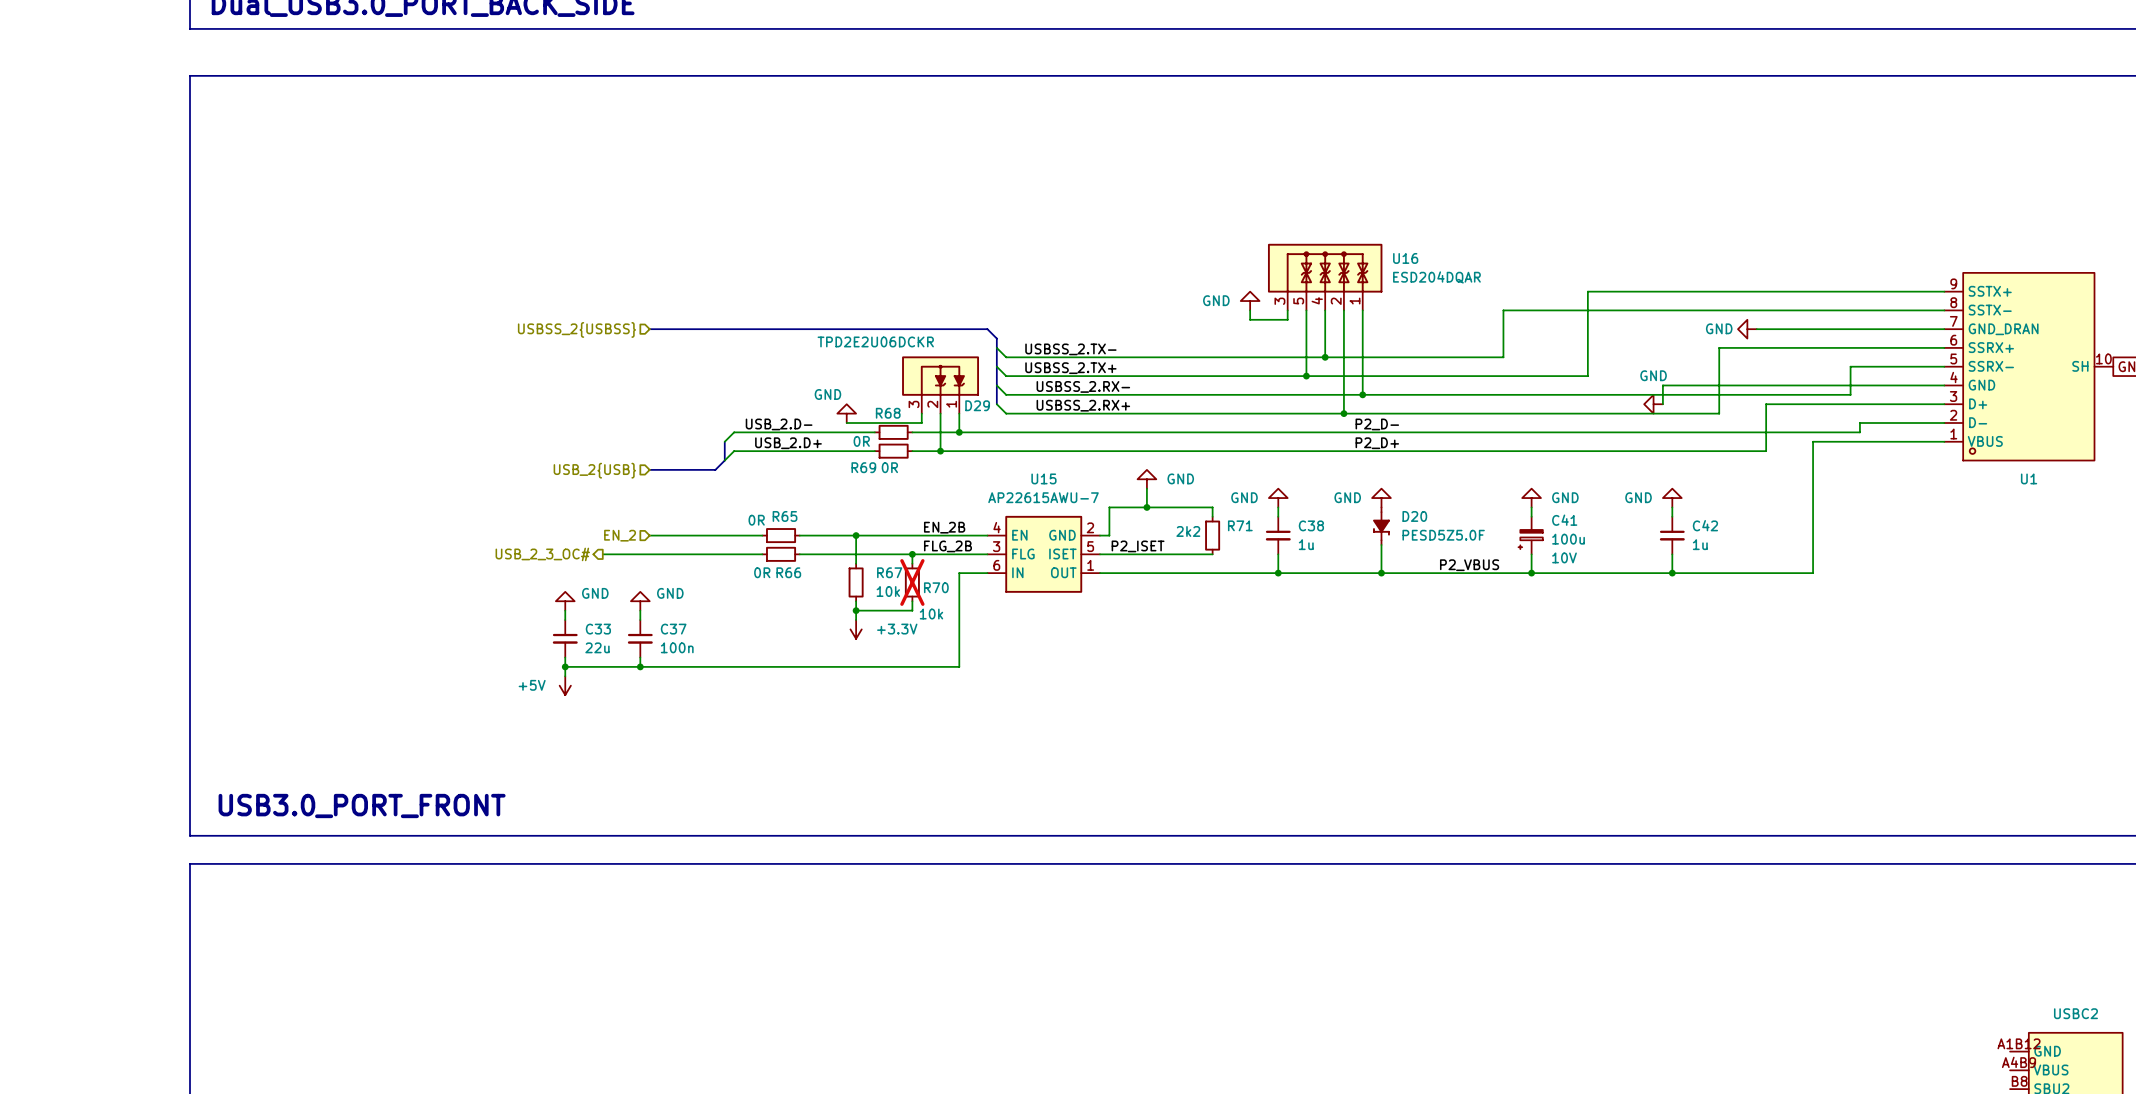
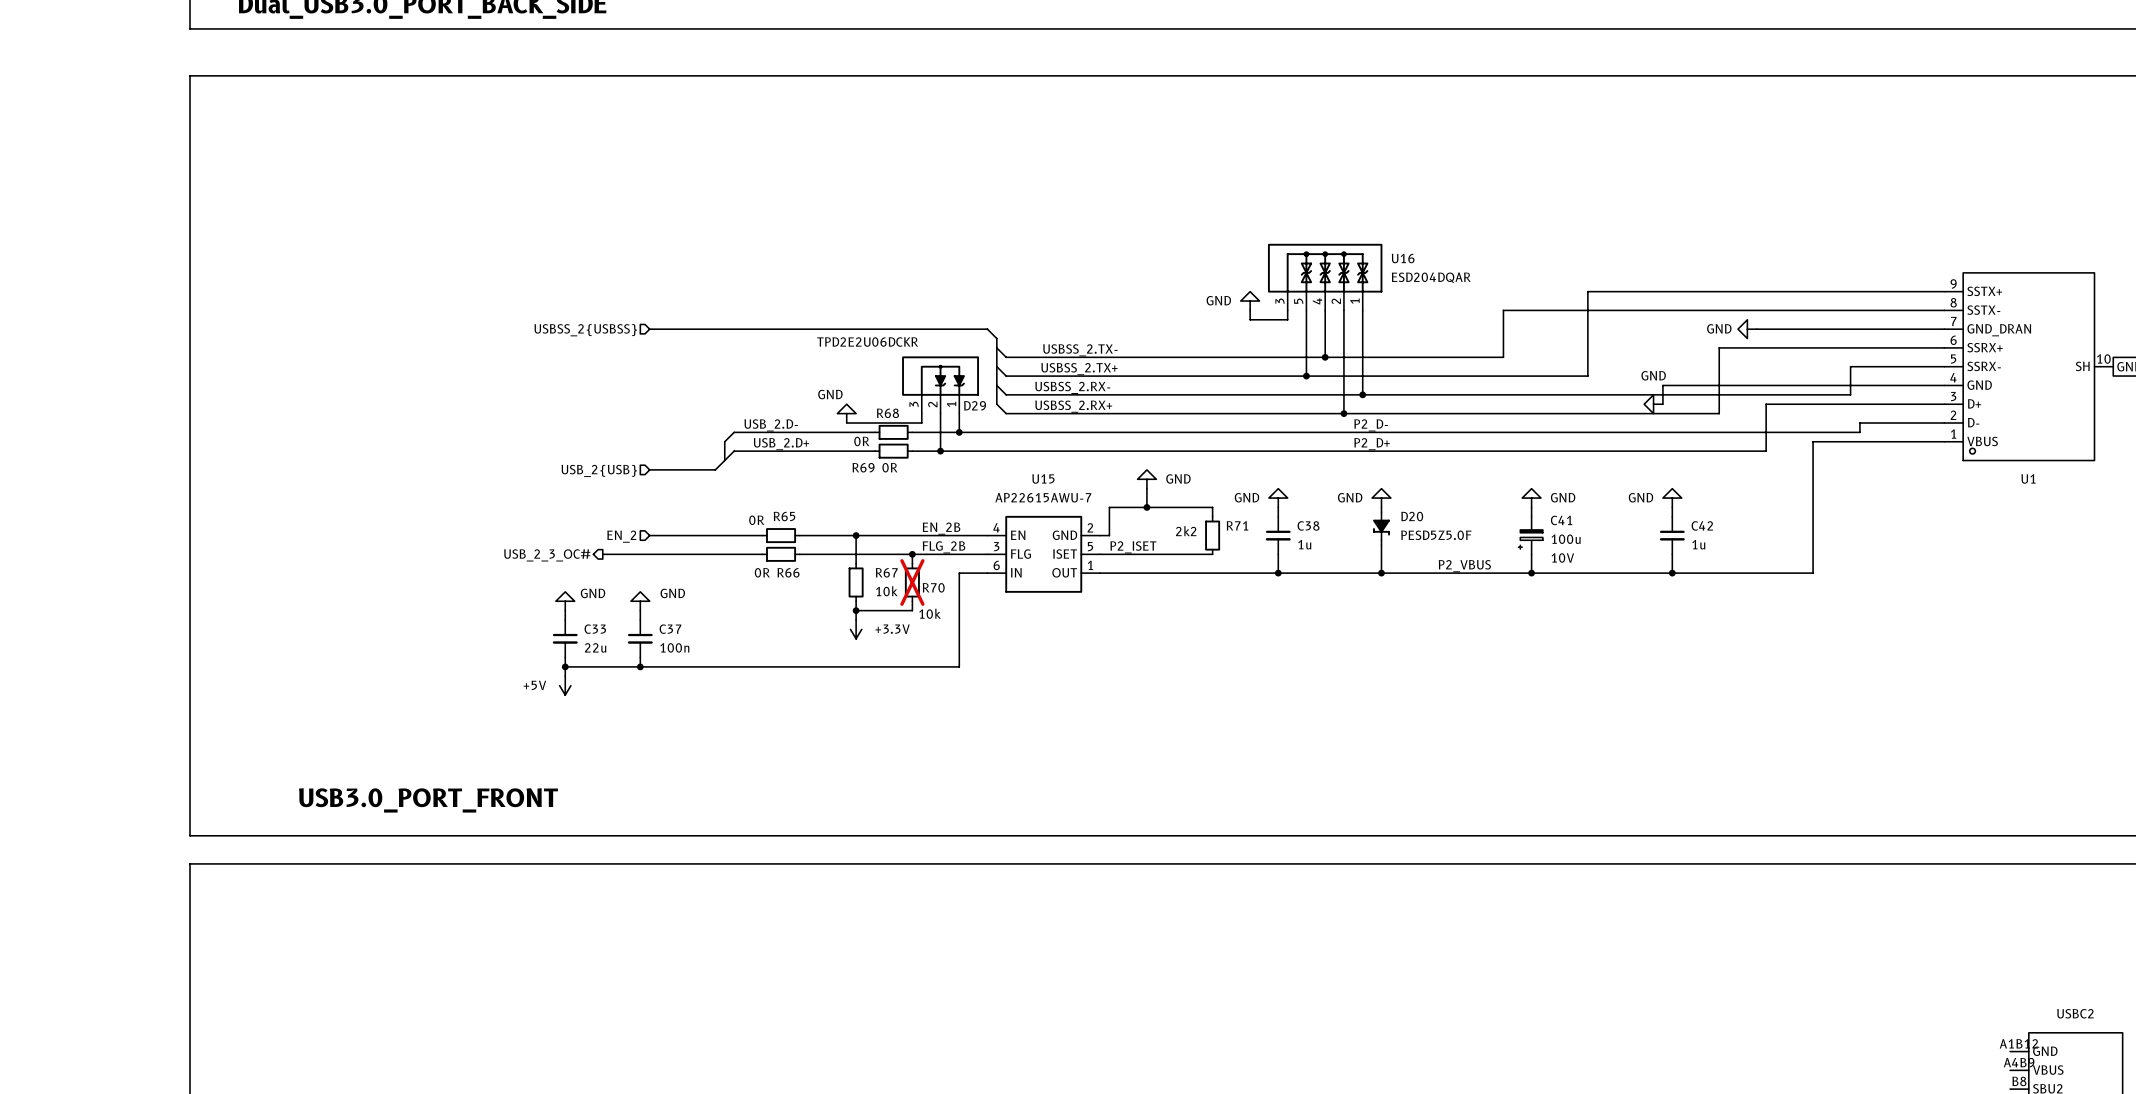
text position: USB3.0_PORT_FRONT (362, 805) -> USB3.0_PORT_FRONT (428, 800)

